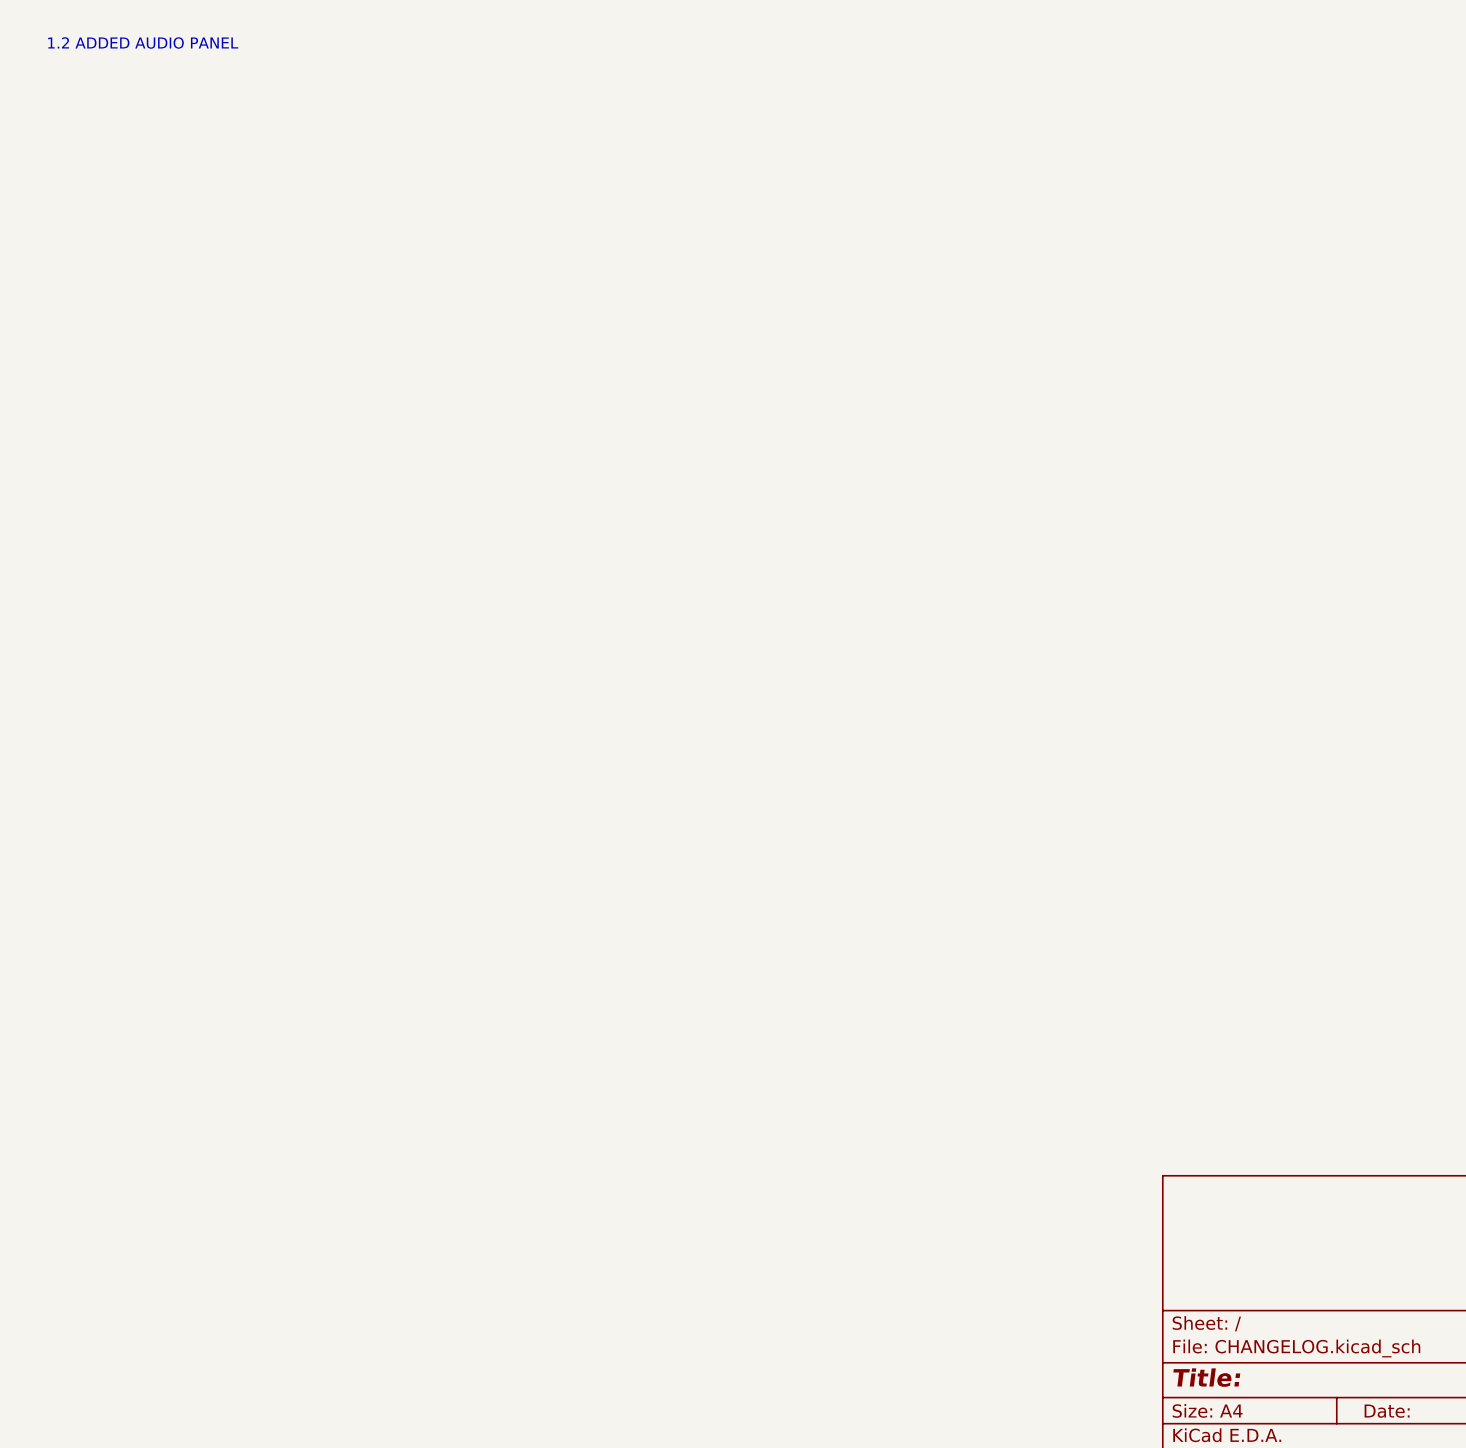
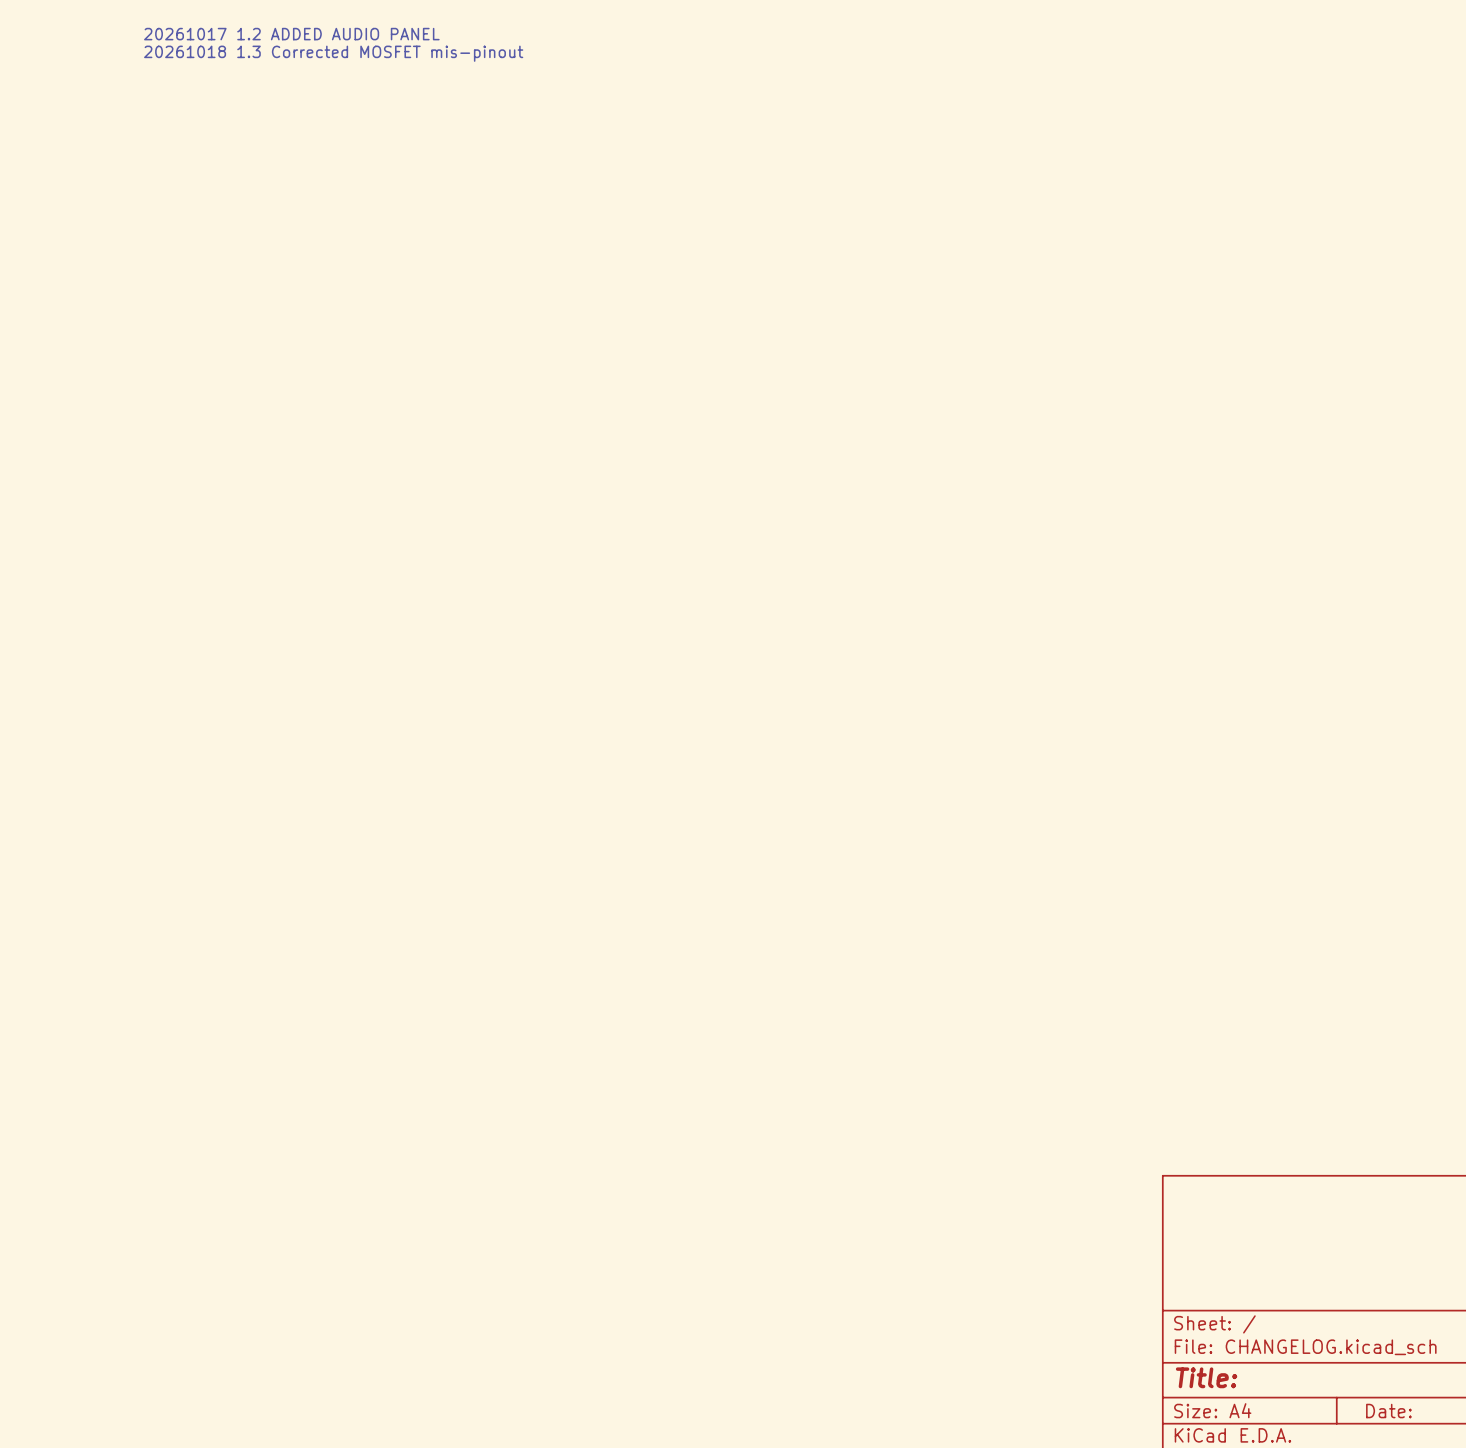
text: 1.2 ADDED AUDIO PANEL (143, 42) -> 20261017 1.2 ADDED AUDIO PANEL (291, 34)
text: none -> 20261018 1.3 Corrected MOSFET mis-pinout (333, 53)

